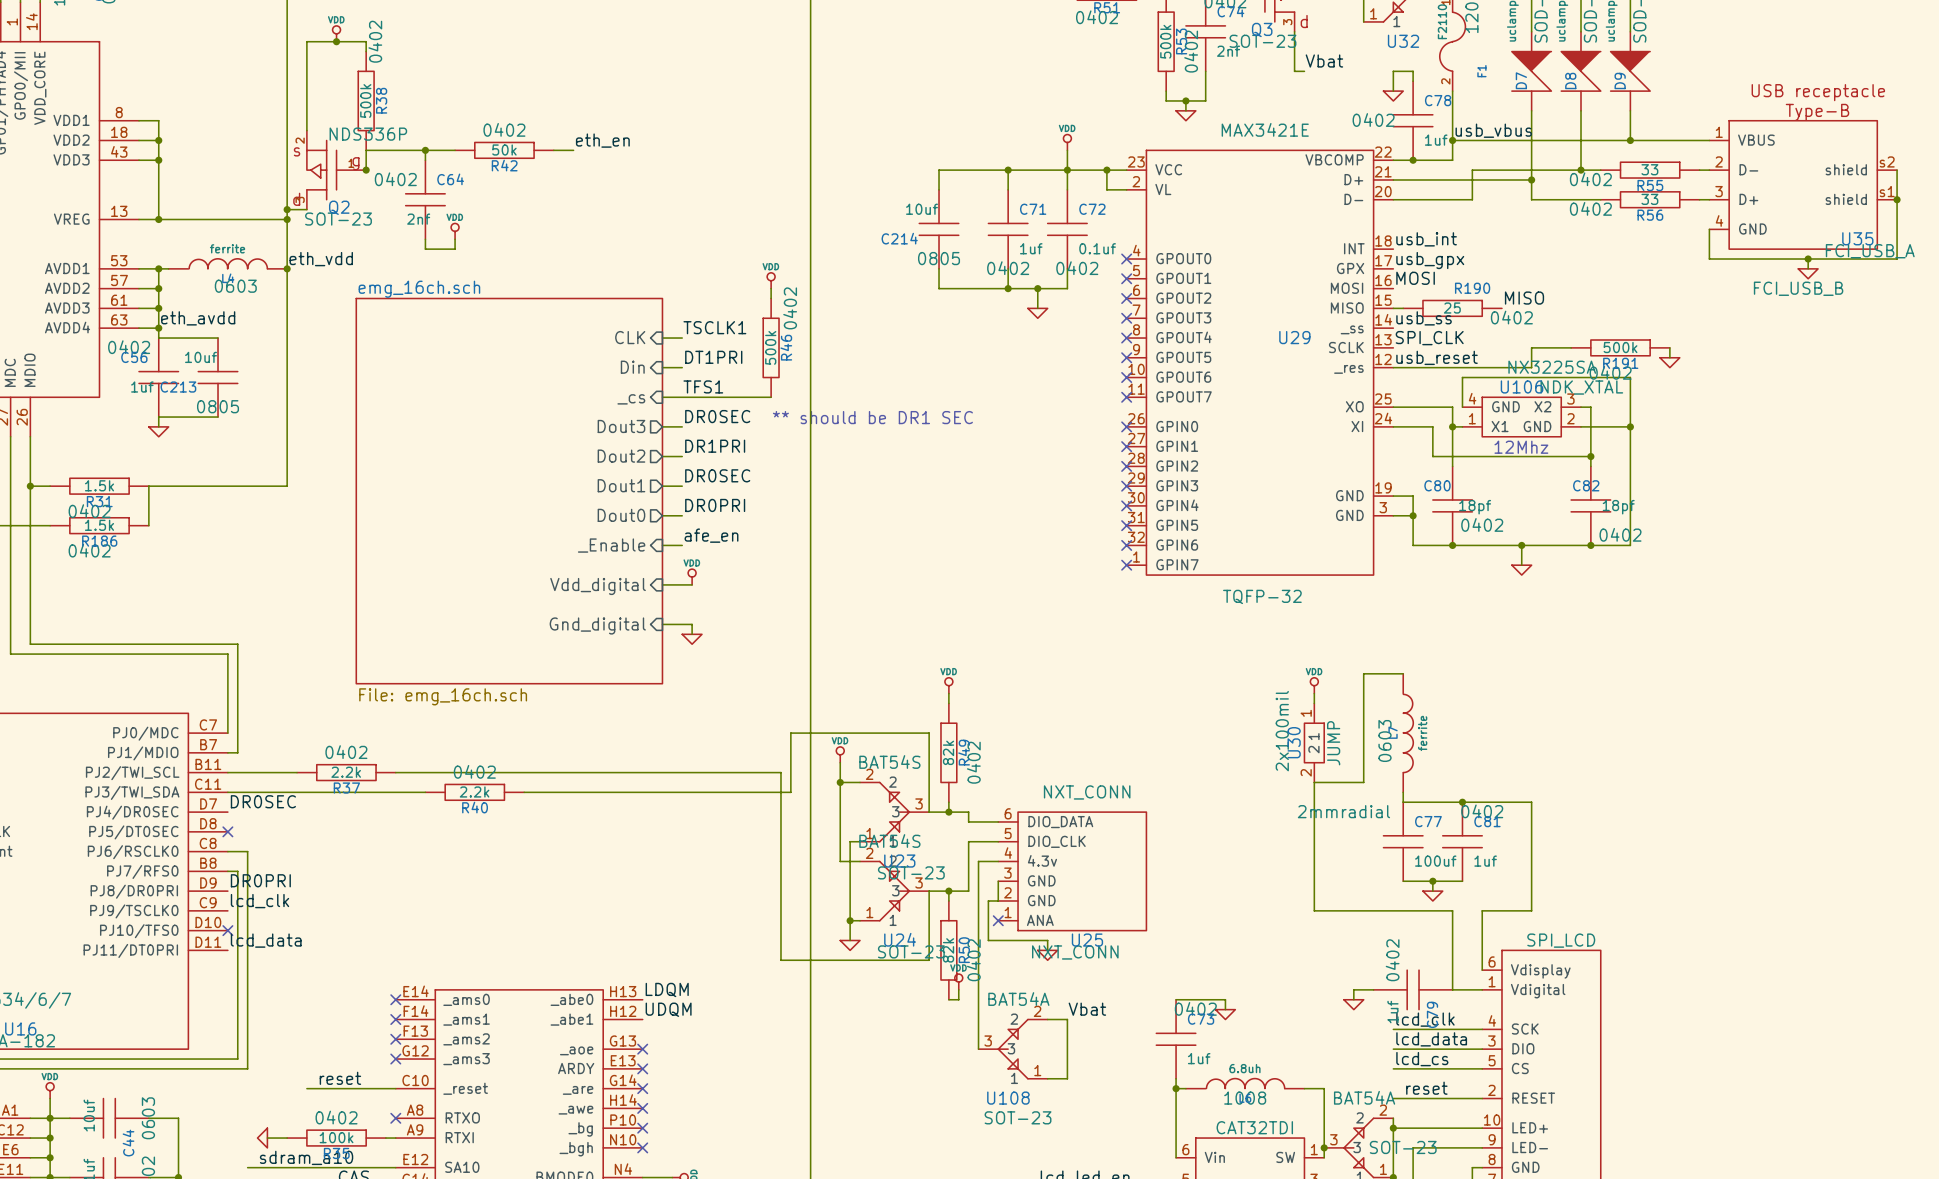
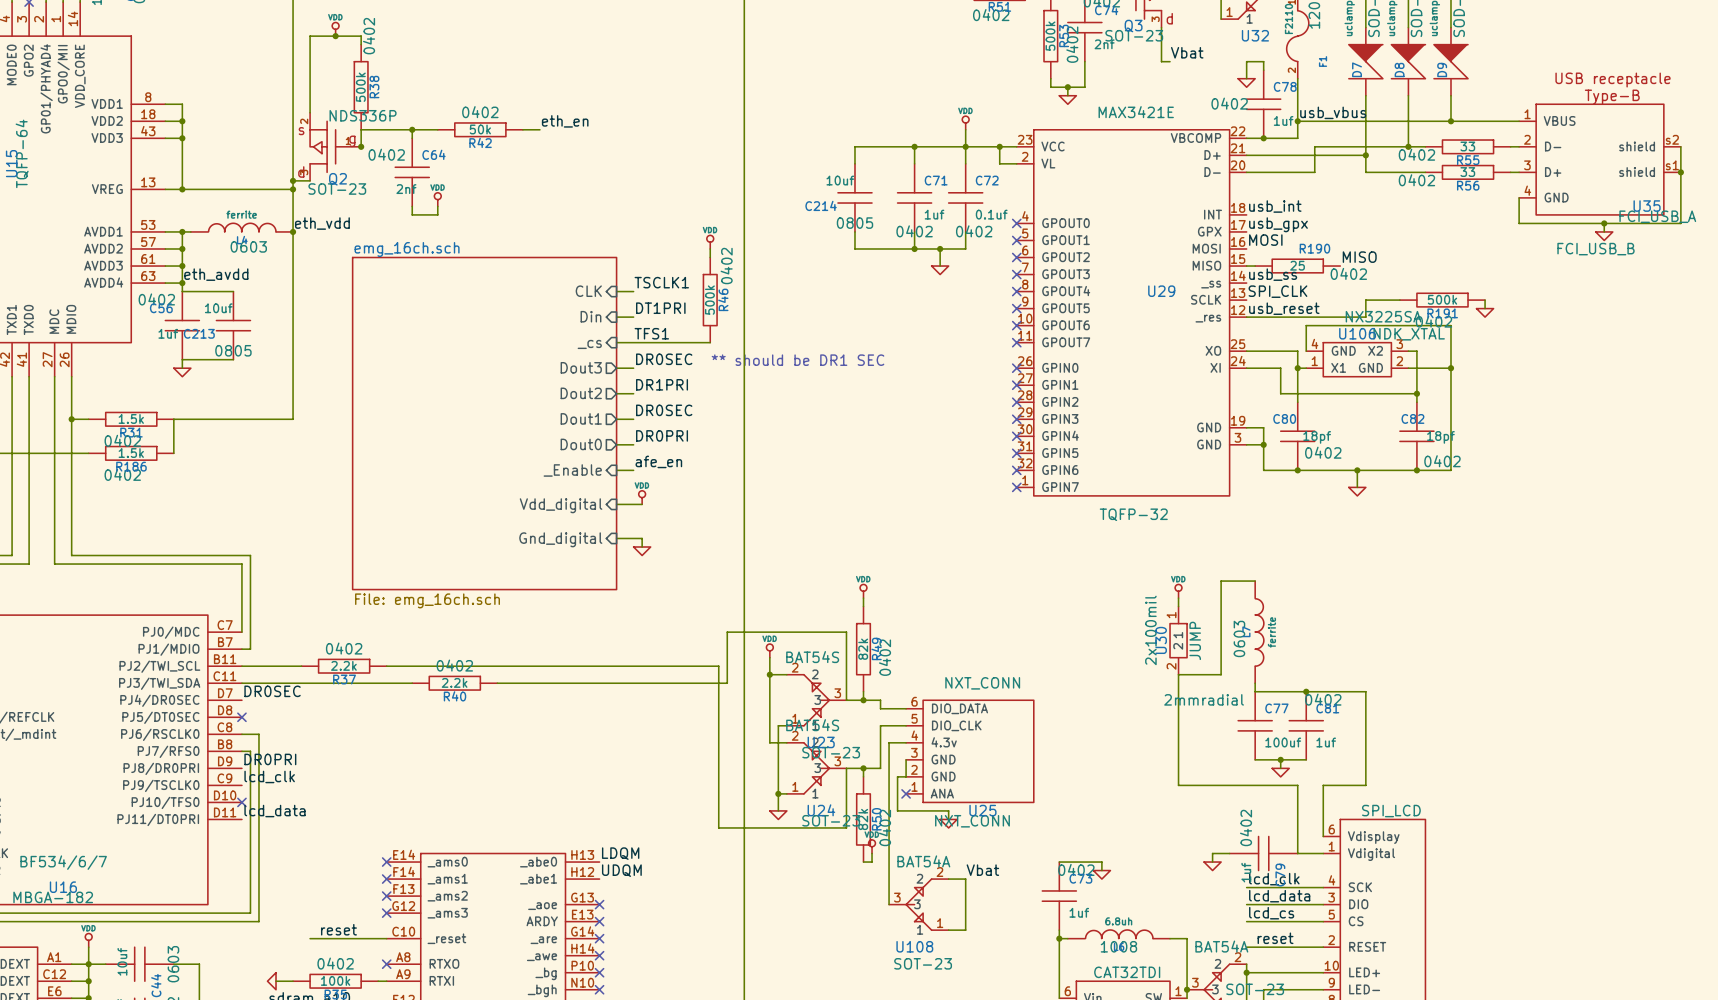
text: 12Mhz (1521, 447) -> none

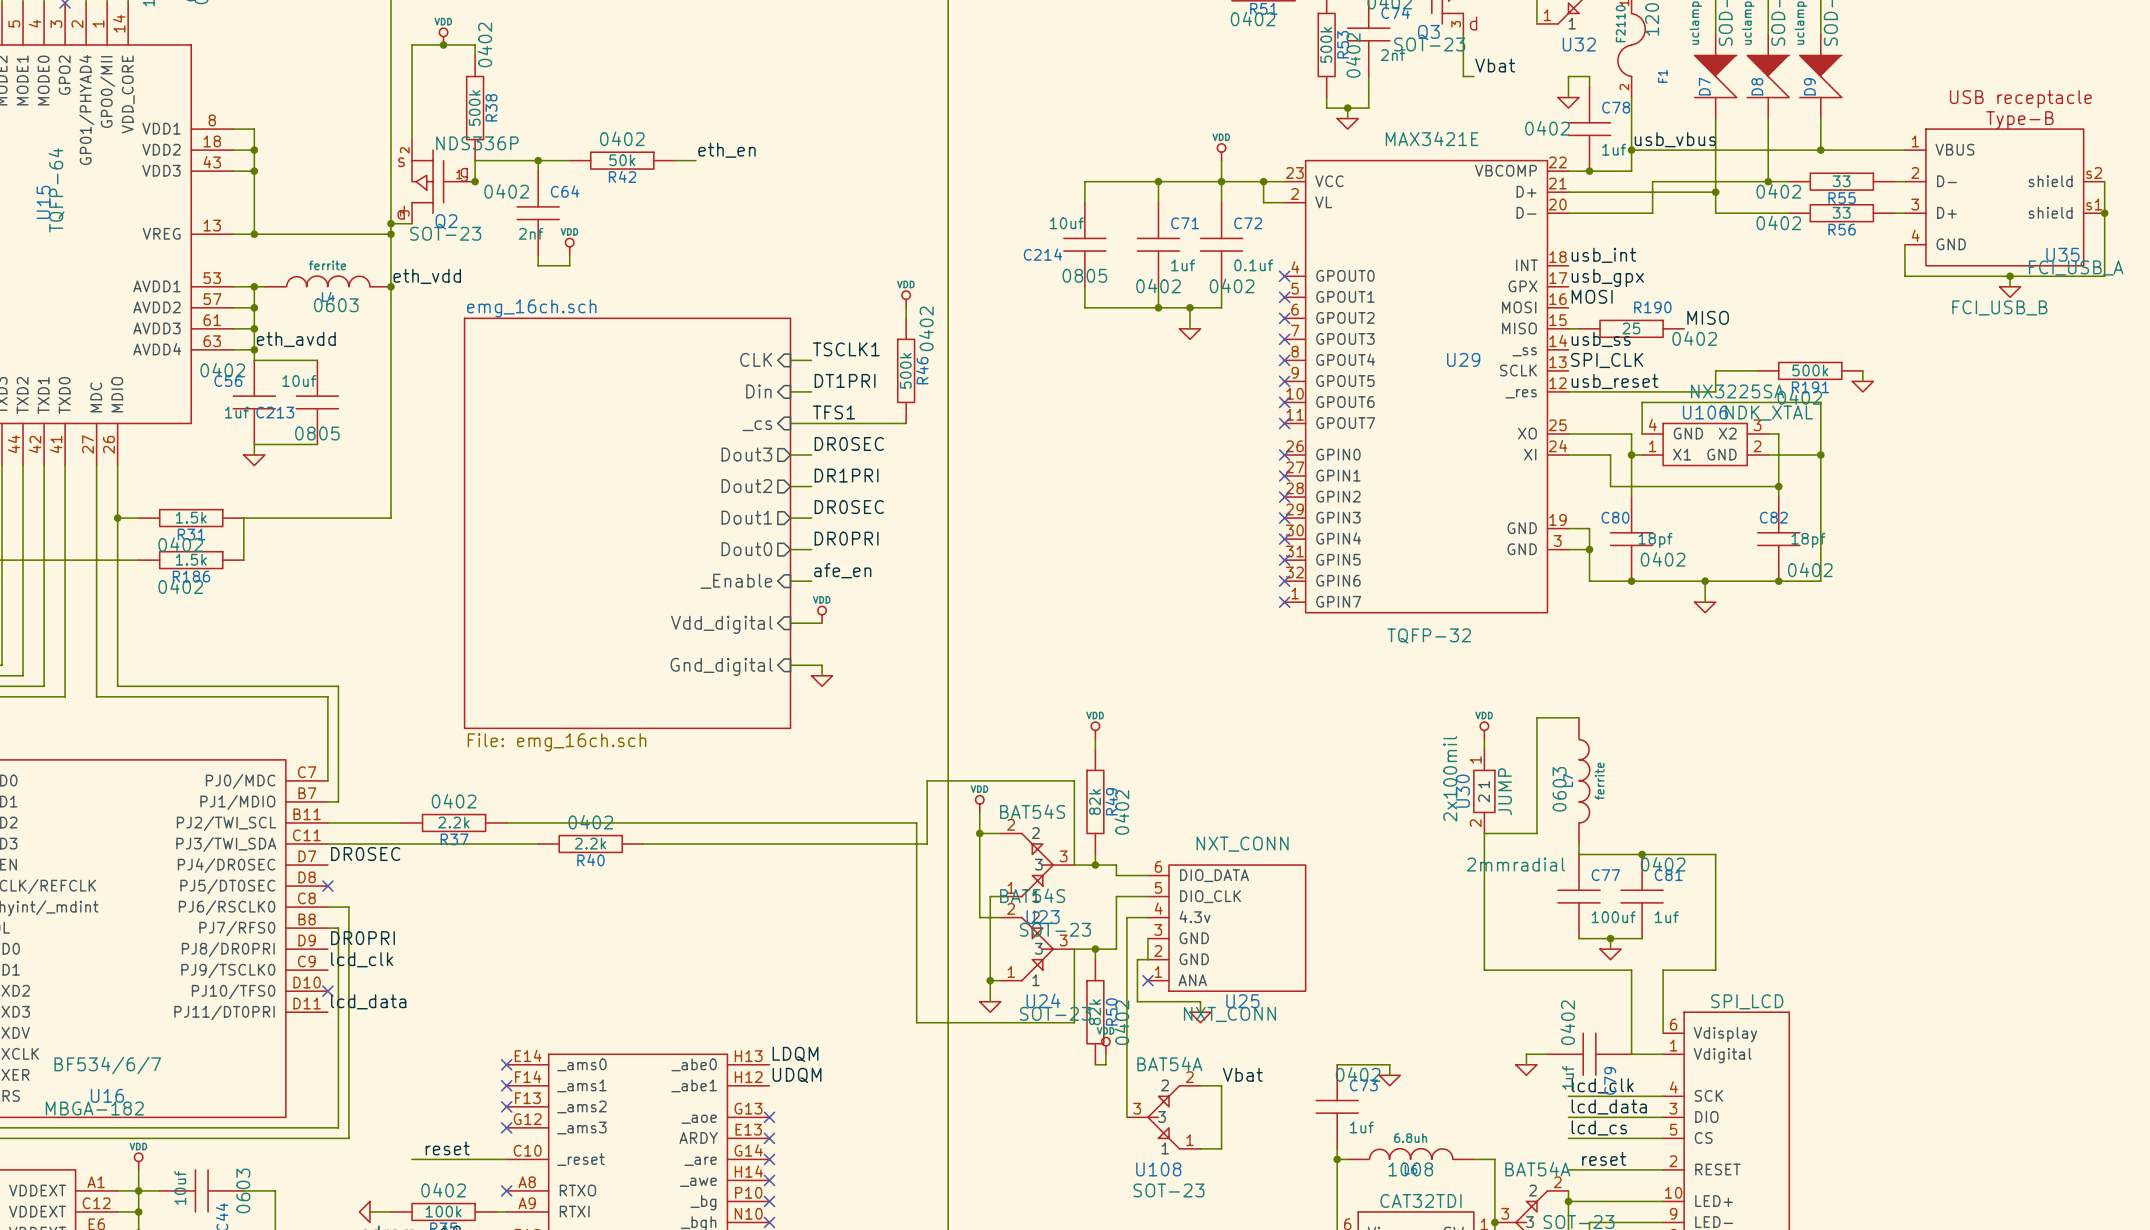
text: ** should be DR1 SEC (798, 360) -> none

